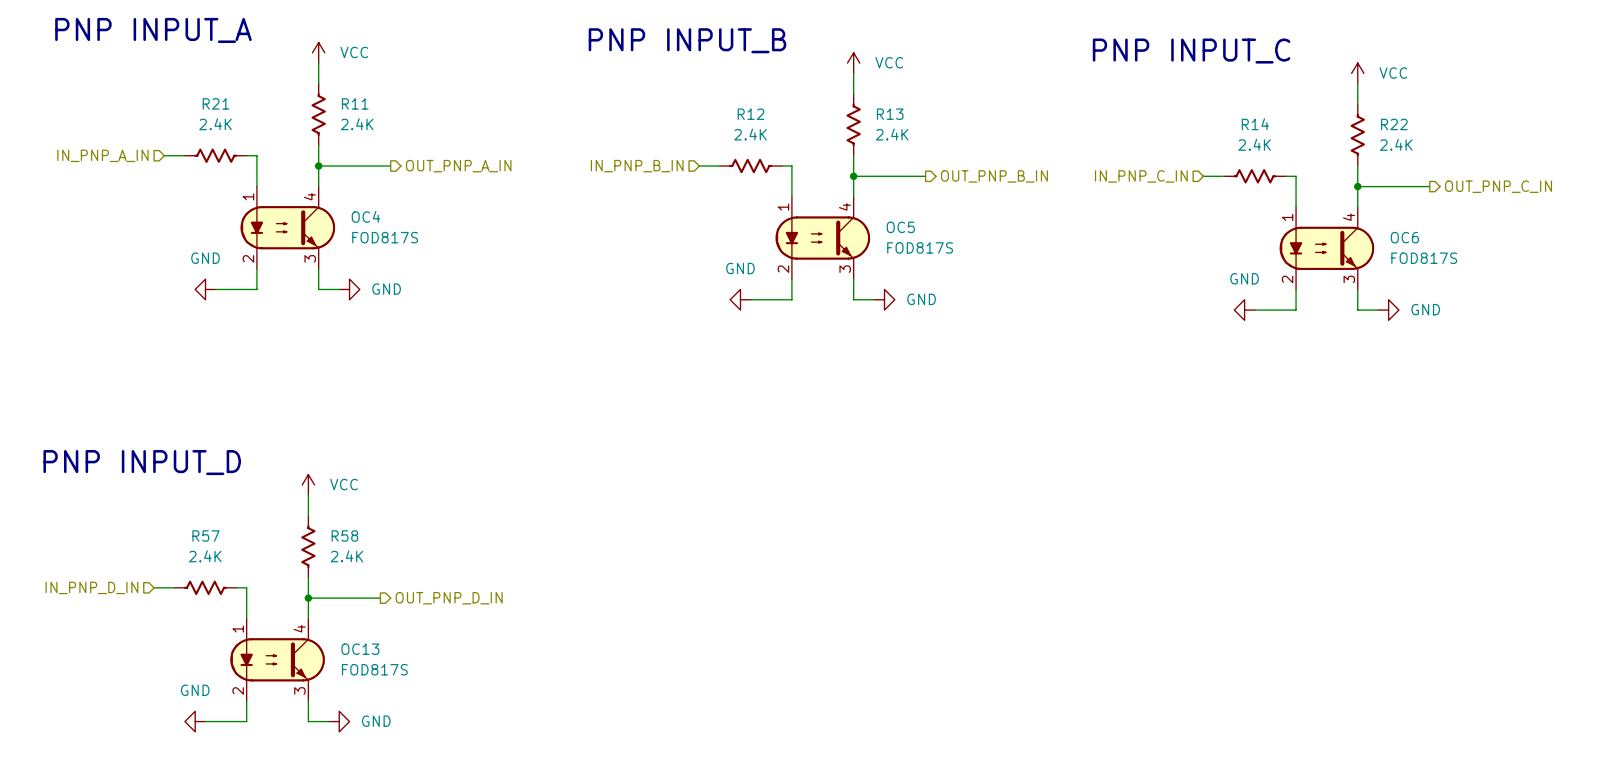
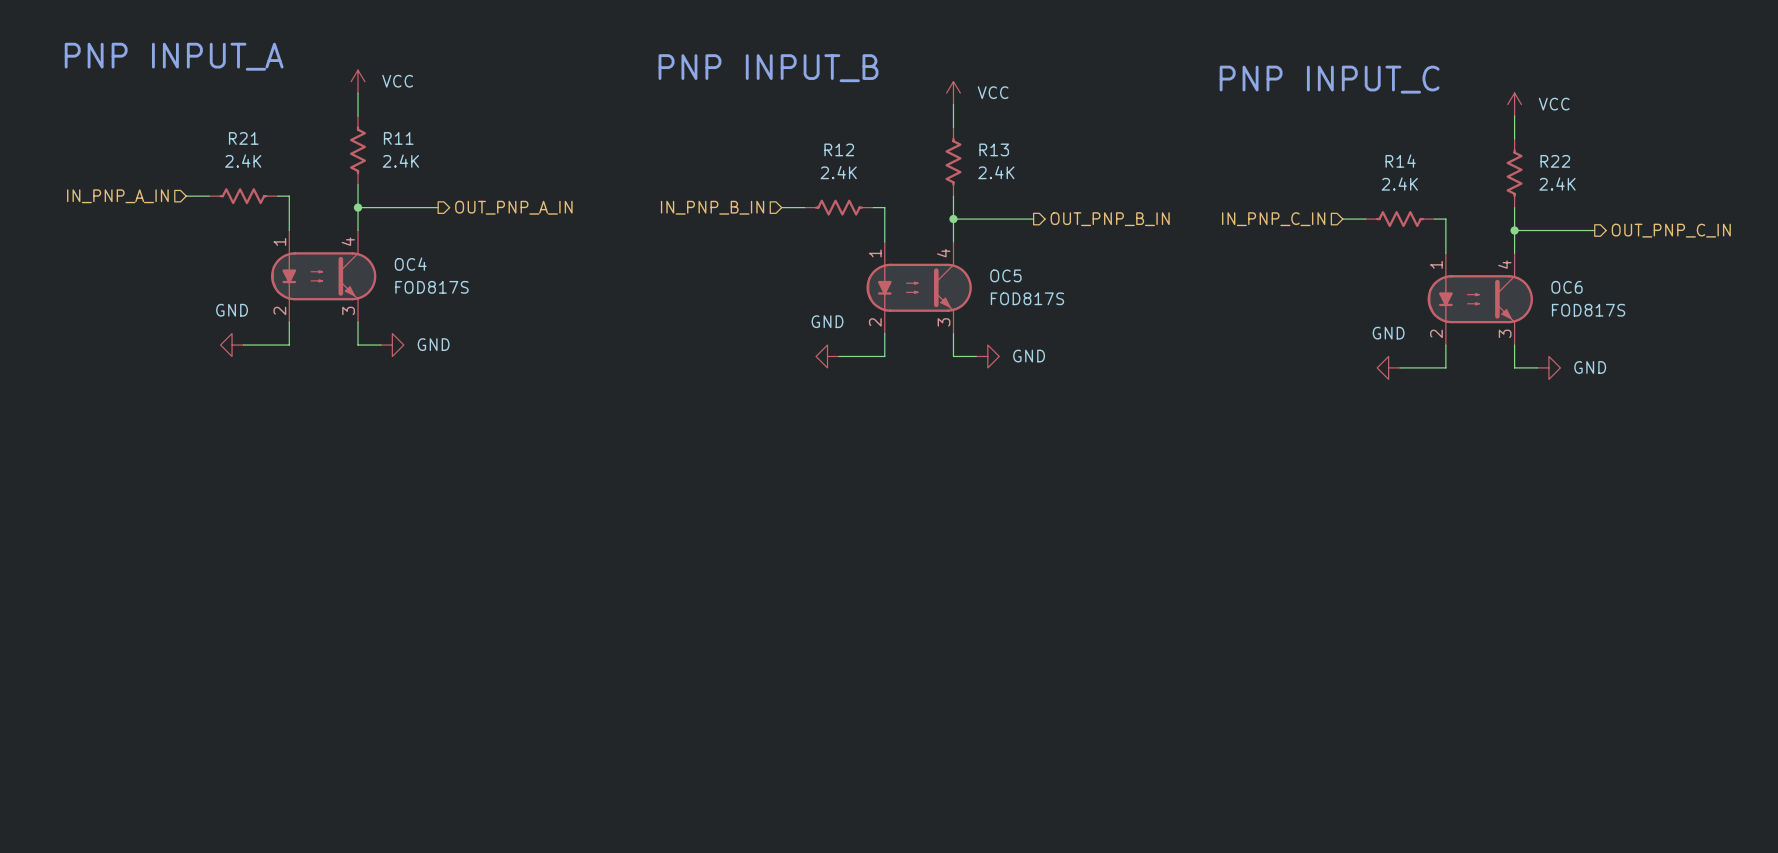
text: PNP INPUT_D (142, 462) -> none
power symbol: VCC (308, 484) -> none
wire: (308, 495) (308, 515) -> none
R58: 2.4K (308, 546) -> none
wire: (308, 577) (308, 618) -> none
hierarchical label: IN_PNP_D_IN (91, 587) -> none
wire: (154, 587) (174, 587) -> none
R57: 2.4K (205, 587) -> none
wire: (236, 587) (246, 587) (246, 618) -> none
wire: (308, 598) (380, 598) -> none
junction: (308, 598) -> none
hierarchical label: OUT_PNP_D_IN (449, 598) -> none
OC13: FOD817S (277, 659) -> none
wire: (246, 701) (246, 721) (205, 721) -> none
wire: (308, 701) (308, 721) (328, 721) -> none
power symbol: GND (195, 721) -> none
power symbol: GND (339, 721) -> none

